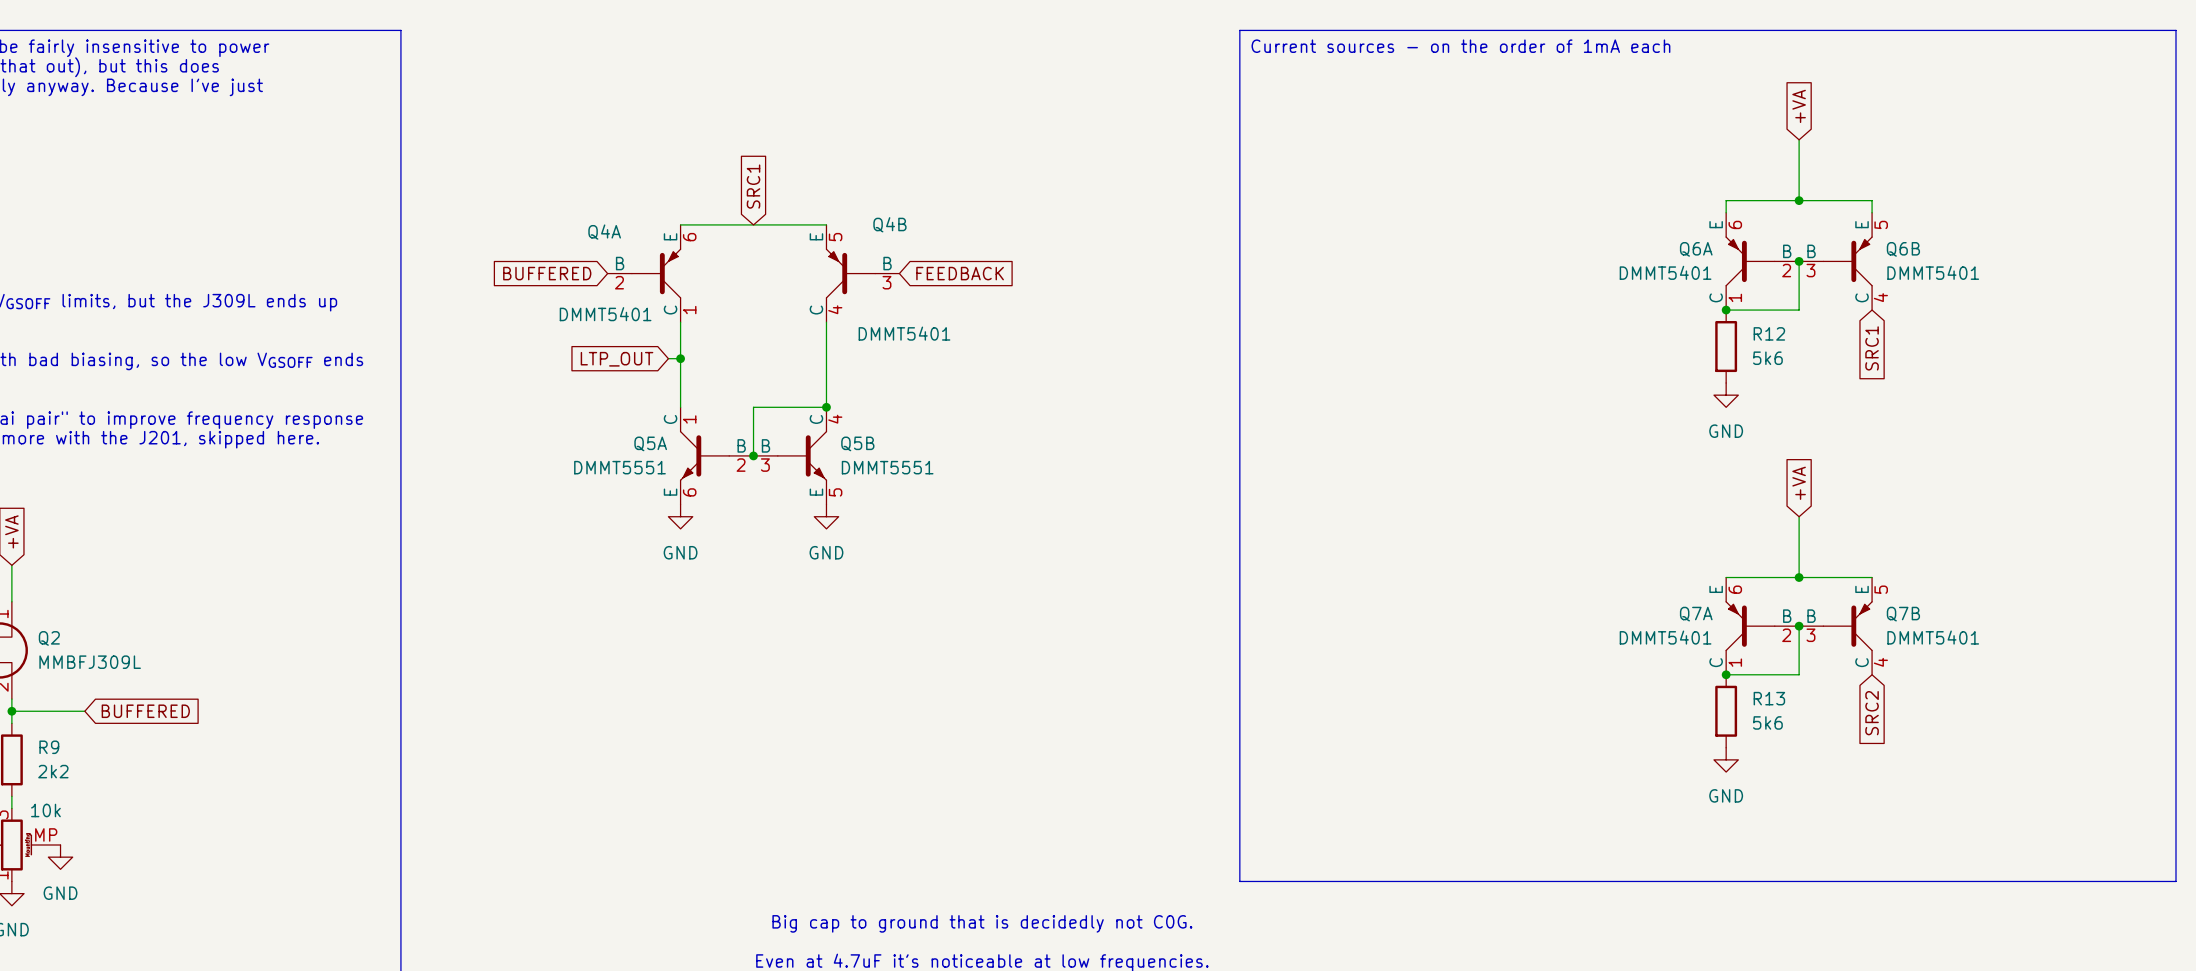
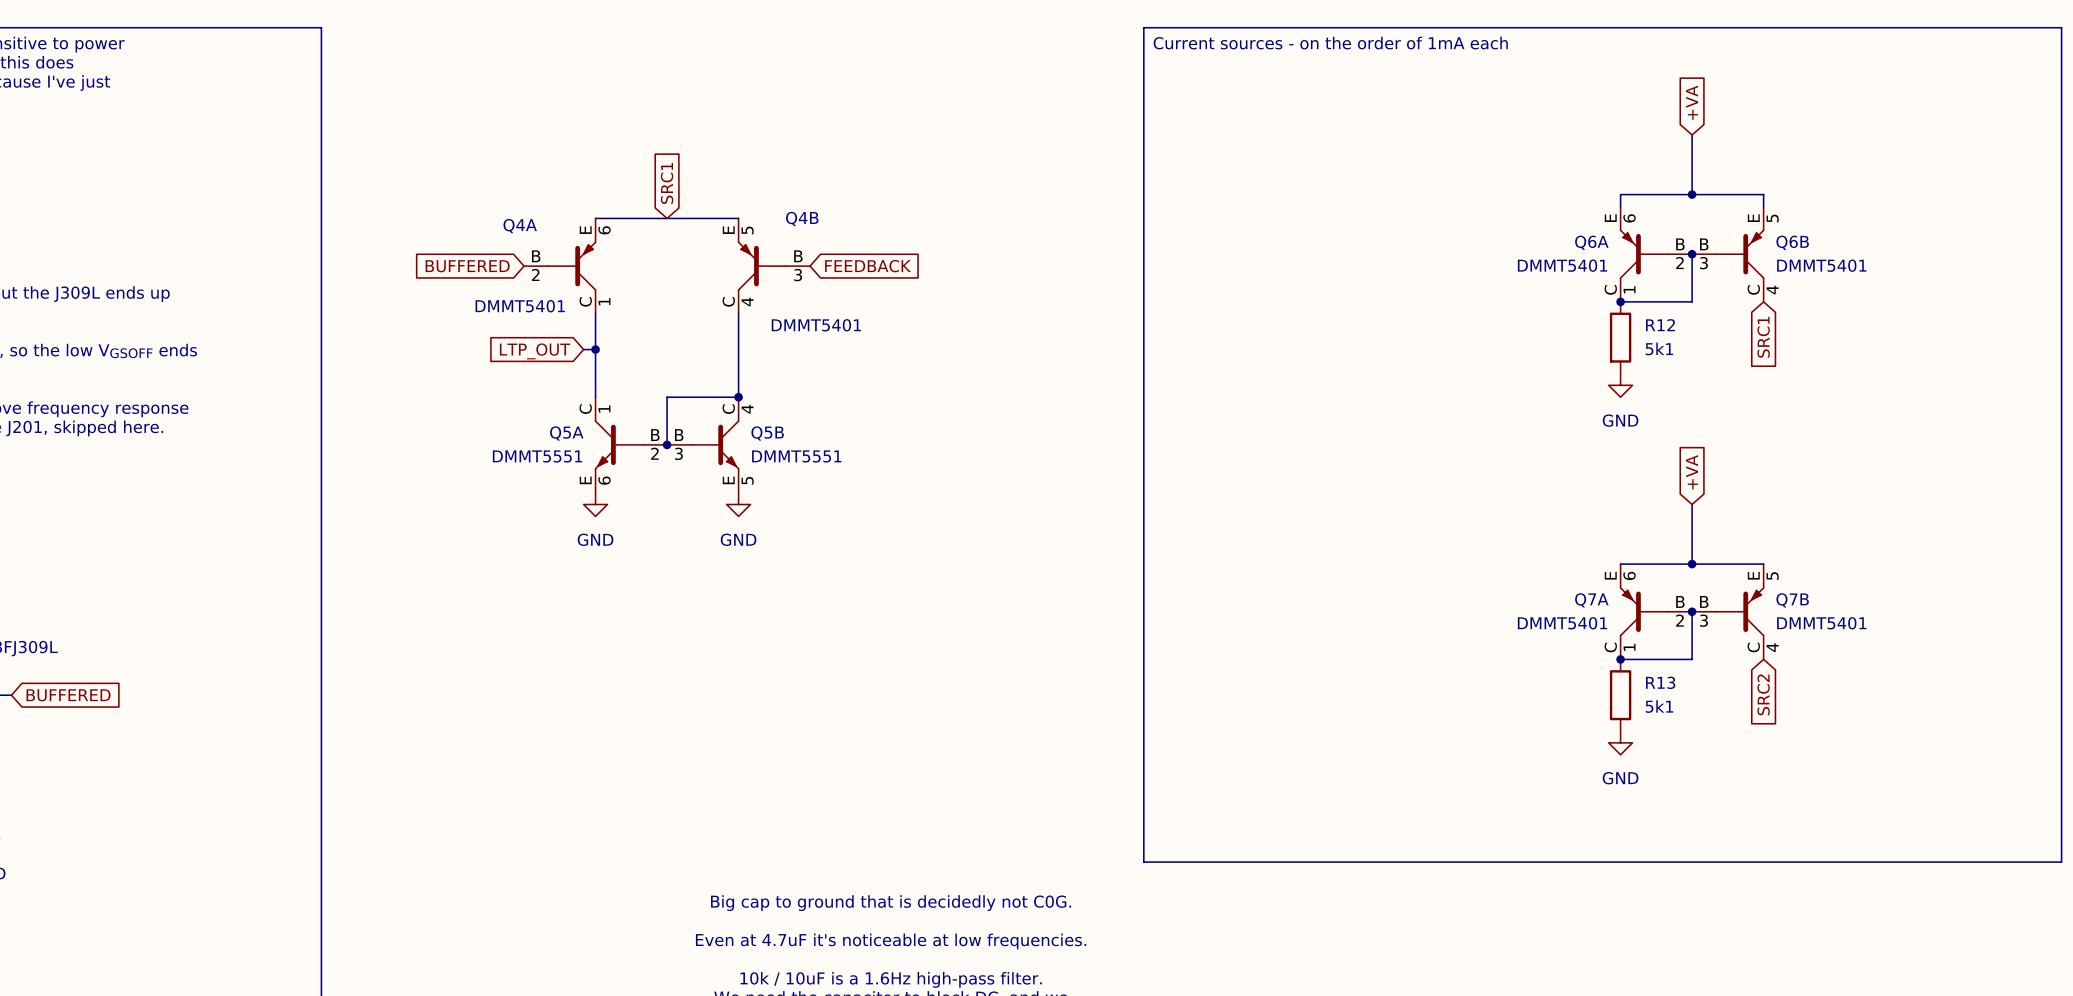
R12 value: 5k6 (1767, 358) -> 5k1 (1659, 348)
R13 value: 5k6 (1767, 722) -> 5k1 (1659, 706)

